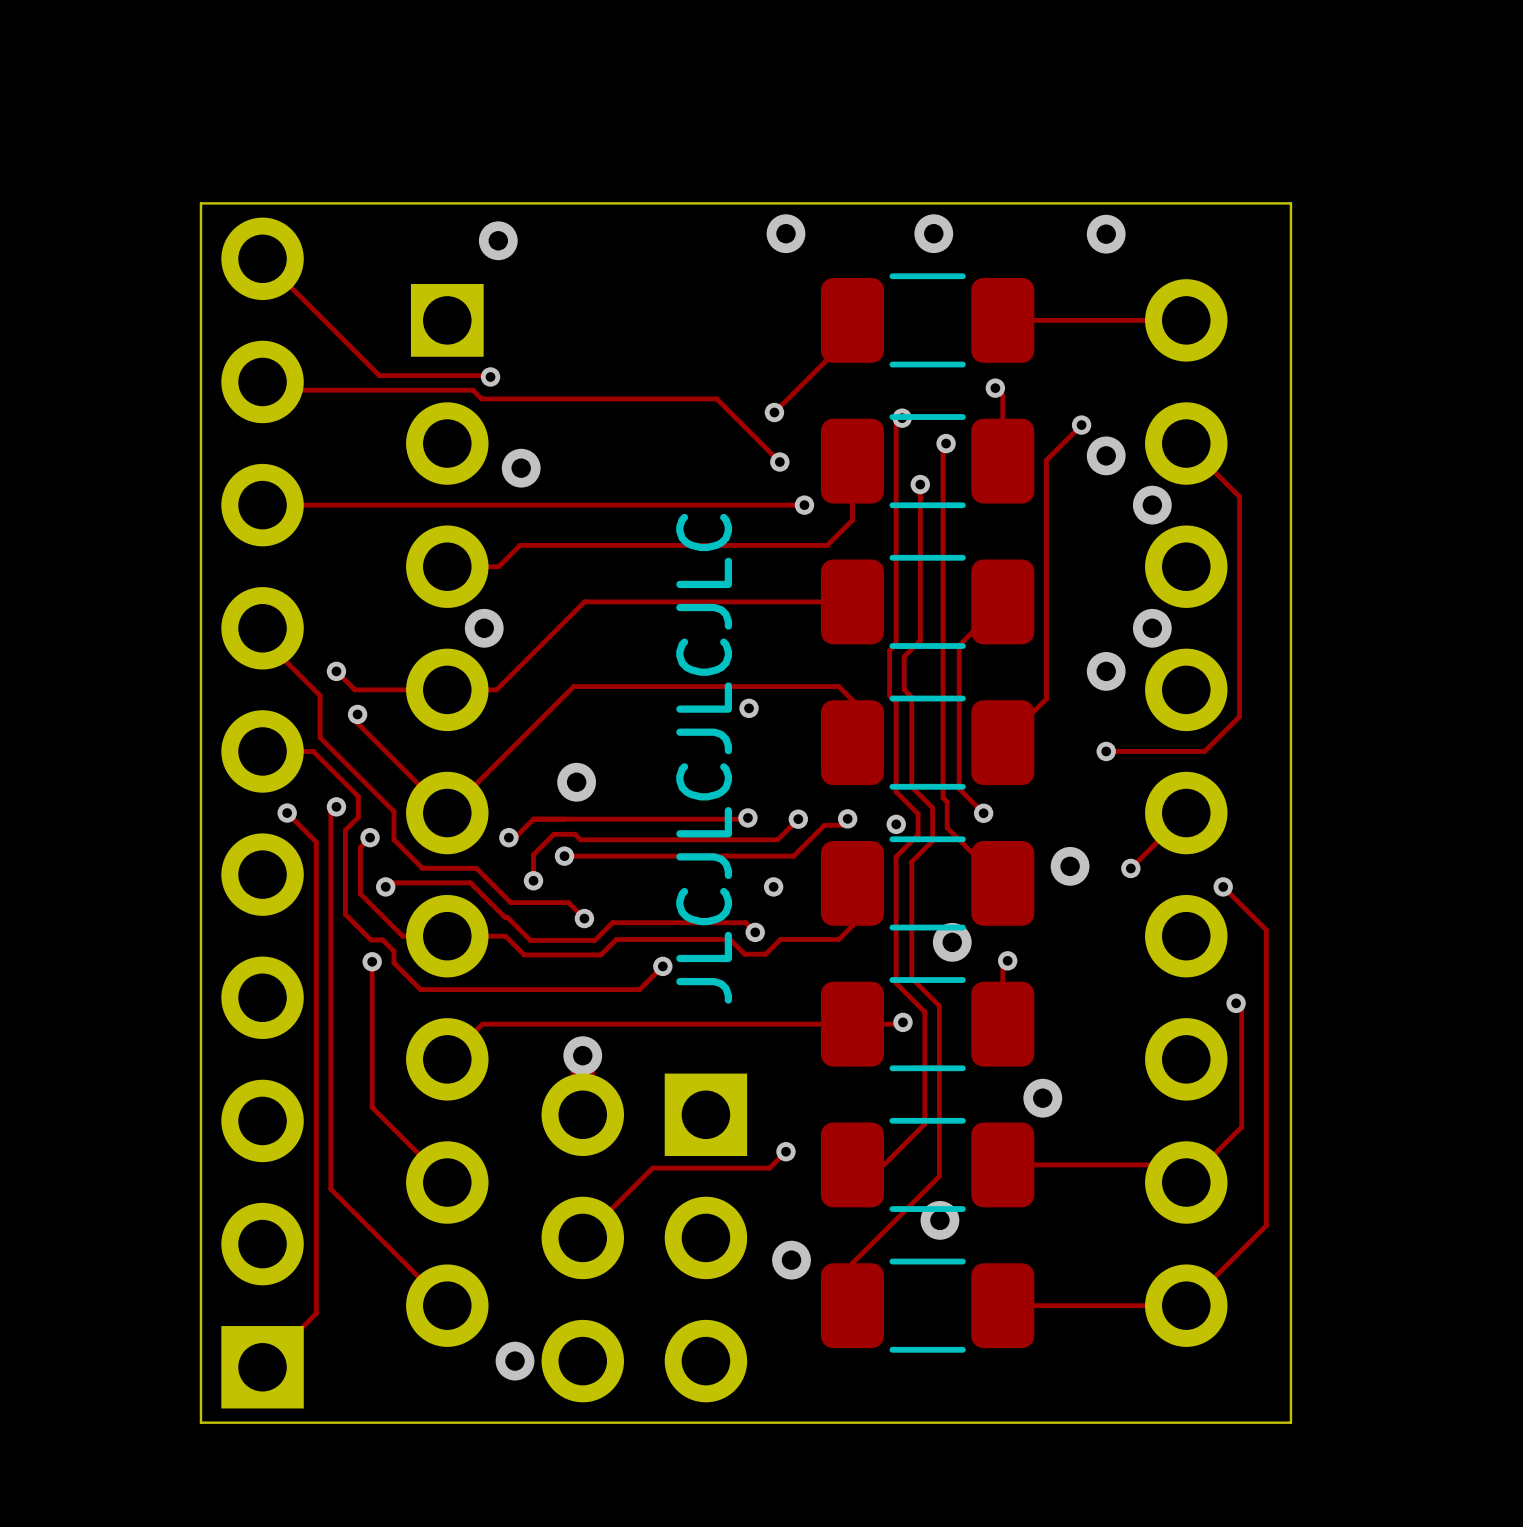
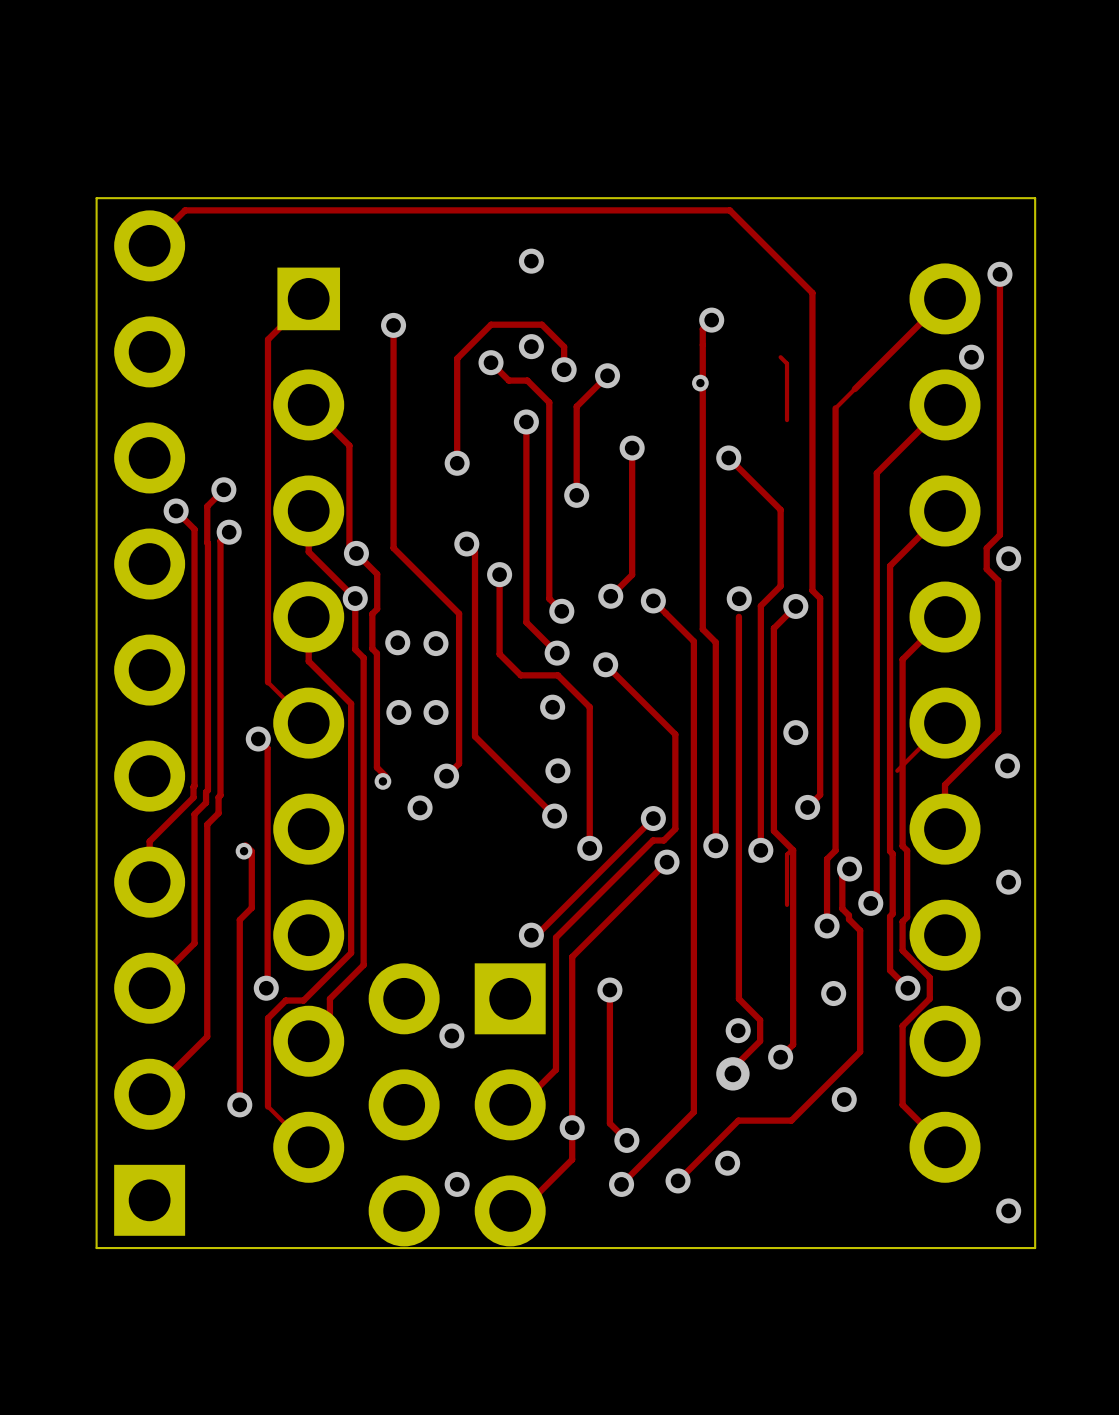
via: (785, 233) -> none
via: (933, 233) -> none
via: (1106, 234) -> none
via: (498, 240) -> none
track: (262, 258) (379, 375) (490, 376) -> (149, 245) (185, 210) (729, 210) (812, 292) (812, 590) (820, 598) (820, 794) (807, 807)
via: none -> (531, 261)
track: none -> (999, 274) (999, 534) (986, 548) (986, 569) (998, 580) (998, 731) (945, 784) (945, 829)
via: none -> (999, 274)
track: (852, 320) (852, 334) (774, 412) -> none
part: (927, 320) -> none
track: (1002, 320) (1186, 320) -> (854, 389) (945, 298)
track: none -> (711, 320) (702, 329) (702, 629) (715, 642) (715, 845)
via: none -> (711, 320)
track: none -> (393, 325) (393, 548) (459, 613) (459, 763) (446, 776)
via: none -> (393, 325)
via: none -> (531, 346)
via: (490, 376) -> none
track: (262, 381) (270, 390) (472, 390) (481, 398) (716, 398) (779, 462) -> none
via: (995, 388) -> none
via: none -> (971, 357)
track: none -> (491, 362) (508, 380) (527, 380) (549, 402) (549, 598) (561, 611)
via: none -> (491, 362)
track: none -> (564, 369) (564, 346) (541, 324) (491, 324) (457, 358) (457, 463)
via: none -> (564, 369)
track: none -> (607, 375) (576, 406) (576, 495)
via position: (774, 412) -> (607, 375)
track: (902, 418) (896, 424) (896, 644) (889, 650) (889, 695) (896, 702) (896, 791) (918, 813) (918, 834) (896, 856) (896, 983) (924, 1011) (924, 1124) (883, 1164) (852, 1164) -> none
via: (1081, 425) -> none
track: none -> (308, 404) (349, 445) (349, 555) (356, 553) (377, 574) (377, 609) (372, 613) (372, 648) (376, 653) (376, 767) (385, 776)
track: (946, 443) (943, 446) (943, 797) (947, 801) (947, 827) (1002, 883) -> none
via: (946, 443) -> none
track: (1186, 443) (1239, 496) (1239, 716) (1204, 751) (1106, 751) -> (945, 404) (876, 473) (876, 897) (870, 903)
track: (1059, 447) (1046, 460) (1046, 699) (1002, 742) -> (835, 408) (835, 850) (827, 859) (827, 925)
via: (1106, 455) -> none
track: (852, 461) (852, 520) (827, 545) (520, 545) (498, 566) (447, 566) -> none
part: (927, 461) -> none
via: (779, 462) -> none
track: none -> (526, 421) (526, 622) (557, 653)
via: none -> (526, 421)
via: (521, 468) -> none
track: (920, 484) (920, 640) (904, 656) (904, 689) (911, 697) (911, 787) (932, 807) (932, 840) (911, 861) (911, 978) (939, 1005) (939, 1176) (852, 1263) (852, 1305) -> none
via position: (920, 484) -> (728, 457)
track: none -> (632, 448) (632, 574) (610, 596)
track: (262, 505) (804, 505) -> none
via position: (804, 505) -> (632, 448)
track: none -> (728, 457) (780, 509) (780, 586) (760, 605) (760, 850)
via: (1152, 505) -> none
via: none -> (457, 463)
track: none -> (223, 489) (207, 506) (207, 790) (206, 792) (206, 802) (194, 814) (194, 943) (149, 988)
via: none -> (223, 489)
via: none -> (576, 495)
track: none -> (176, 510) (194, 529) (194, 785) (193, 797) (149, 841) (149, 882)
via: none -> (176, 510)
track: none -> (945, 510) (890, 565) (890, 851) (892, 853) (890, 970) (907, 988)
track: none -> (229, 532) (220, 540) (220, 795) (218, 797) (218, 813) (207, 824) (207, 1036) (149, 1094)
via: none -> (229, 532)
track: (852, 601) (584, 601) (496, 689) (354, 689) (336, 671) -> none
part: (927, 601) -> none
track: (1002, 601) (959, 645) (959, 788) (983, 813) -> none
track: none -> (466, 543) (475, 552) (475, 736) (554, 816)
via: none -> (466, 543)
via: none -> (1008, 558)
track: (262, 628) (262, 638) (320, 695) (320, 737) (393, 811) (393, 839) (422, 868) (476, 868) (510, 902) (568, 902) (584, 918) -> none
via position: (484, 628) -> (356, 553)
via: (1152, 628) -> none
track: none -> (499, 574) (499, 654) (520, 675) (557, 675) (589, 707) (589, 848)
via: none -> (499, 574)
via: none -> (610, 596)
via: none -> (355, 598)
via: none -> (739, 598)
via: (336, 671) -> none
track: none -> (653, 600) (693, 641) (693, 1112) (621, 1184)
via: none -> (653, 600)
via: (1106, 671) -> none
track: none -> (795, 606) (773, 628) (773, 830) (793, 850) (793, 1044) (780, 1057)
via: none -> (795, 606)
via: none -> (561, 611)
track: none -> (738, 616) (738, 998) (760, 1020) (760, 1041) (736, 1064) (736, 1079)
track: none -> (945, 617) (902, 659) (902, 846) (907, 850) (907, 917) (902, 921) (902, 950) (929, 977) (929, 998) (902, 1025) (902, 1104) (945, 1147)
via position: (749, 708) -> (557, 653)
track: (357, 714) (357, 723) (400, 765) -> (308, 298) (268, 339) (268, 682)
via: (357, 714) -> none
via: none -> (397, 642)
via: none -> (435, 643)
track: (852, 742) (852, 700) (838, 686) (573, 686) (447, 813) -> none
part: (927, 742) -> none
track: none -> (605, 664) (675, 734) (675, 829) (663, 840) (653, 840) (556, 937) (556, 1069) (510, 1115)
via: none -> (605, 664)
track: (262, 751) (313, 751) (358, 796) (358, 817) (345, 830) (345, 914) (371, 939) (382, 939) (394, 951) (394, 962) (420, 989) (639, 989) (662, 966) -> none
via: (1106, 751) -> none
text: JLCJLCJLCJLC (704, 758) -> none
via: (576, 782) -> none
via: none -> (398, 712)
via: none -> (436, 712)
track: (336, 806) (330, 812) (330, 1189) (400, 1258) -> (308, 617) (308, 661) (351, 703) (351, 953) (303, 1000) (285, 1000) (268, 1018) (268, 1106)
via: (336, 806) -> none
track: (287, 813) (316, 842) (316, 1313) (262, 1367) -> none
via: (287, 813) -> none
via: (983, 813) -> none
track: (747, 817) (533, 819) (515, 837) (508, 837) -> none
via position: (747, 817) -> (552, 707)
via: (847, 818) -> none
track: (798, 819) (777, 839) (580, 839) (574, 834) (553, 834) (533, 854) (533, 880) -> none
via: (798, 819) -> none
track: (853, 819) (847, 825) (824, 825) (793, 856) (564, 856) -> none
via: (896, 824) -> none
via: none -> (795, 732)
track: none -> (258, 739) (267, 748) (266, 988)
track: (370, 837) (360, 847) (360, 893) (402, 936) (505, 936) (524, 954) (600, 954) (616, 939) (730, 939) (744, 954) (765, 954) (780, 939) (838, 939) (852, 925) (852, 883) -> none
via position: (370, 837) -> (258, 739)
via: (508, 837) -> none
via: (564, 856) -> none
via: none -> (1007, 765)
via: (1070, 866) -> none
via: none -> (557, 770)
via: (1130, 868) -> none
via: none -> (446, 776)
part: (927, 883) -> none
track: (385, 886) (389, 882) (470, 882) (530, 940) (594, 940) (612, 922) (745, 922) (755, 932) -> none
via: (385, 886) -> none
via: (773, 886) -> none
track: (1223, 886) (1266, 930) (1266, 1225) (1186, 1305) (1002, 1305) -> none
via: (1223, 886) -> none
via size: [574, 908, 595, 929] -> [407, 795, 433, 821]
via: none -> (807, 807)
track: none -> (653, 818) (536, 935) (531, 935)
via: none -> (653, 818)
via position: (755, 932) -> (554, 816)
via: (952, 942) -> none
track: none -> (245, 845) (251, 851) (251, 907) (239, 919) (239, 1104)
via: none -> (715, 845)
via: none -> (589, 848)
via: none -> (760, 850)
via: (1007, 960) -> none
track: (372, 961) (372, 1107) (447, 1182) -> (308, 510) (308, 551) (355, 598) (355, 649) (363, 657) (363, 965) (329, 998) (329, 1020) (308, 1041)
via: (662, 966) -> none
track: none -> (666, 862) (572, 956) (572, 1159) (510, 1221)
via: none -> (666, 862)
track: none -> (849, 869) (842, 876) (842, 908) (848, 915) (848, 919) (860, 930) (860, 1051) (791, 1120) (738, 1120) (678, 1180)
via: none -> (849, 869)
track: (1236, 1003) (1241, 1008) (1241, 1127) (1186, 1182) (1168, 1164) (1002, 1164) -> none
via position: (1236, 1003) -> (1008, 882)
track: (902, 1022) (901, 1024) (482, 1024) (447, 1059) -> none
via: (902, 1022) -> none
via: none -> (870, 903)
part: (927, 1024) -> none
via: none -> (827, 925)
via: (582, 1055) -> none
via: none -> (531, 935)
via position: (1042, 1098) -> (833, 993)
via: none -> (266, 988)
via: none -> (907, 988)
track: none -> (609, 990) (609, 1123) (626, 1140)
via: none -> (609, 990)
via: none -> (1008, 998)
track: (785, 1151) (769, 1168) (652, 1168) (582, 1237) -> none
via: (785, 1151) -> none
part: (927, 1164) -> none
via: none -> (738, 1030)
via: none -> (451, 1035)
via: none -> (780, 1057)
part position: (644, 1237) -> (457, 1104)
via: none -> (844, 1099)
via: none -> (239, 1104)
via: (791, 1260) -> none
via: none -> (572, 1127)
via: none -> (626, 1140)
part: (927, 1305) -> none
via: none -> (727, 1163)
via: none -> (678, 1180)
via: none -> (457, 1184)
via: none -> (621, 1184)
via: (515, 1361) -> none
via: none -> (1008, 1210)

